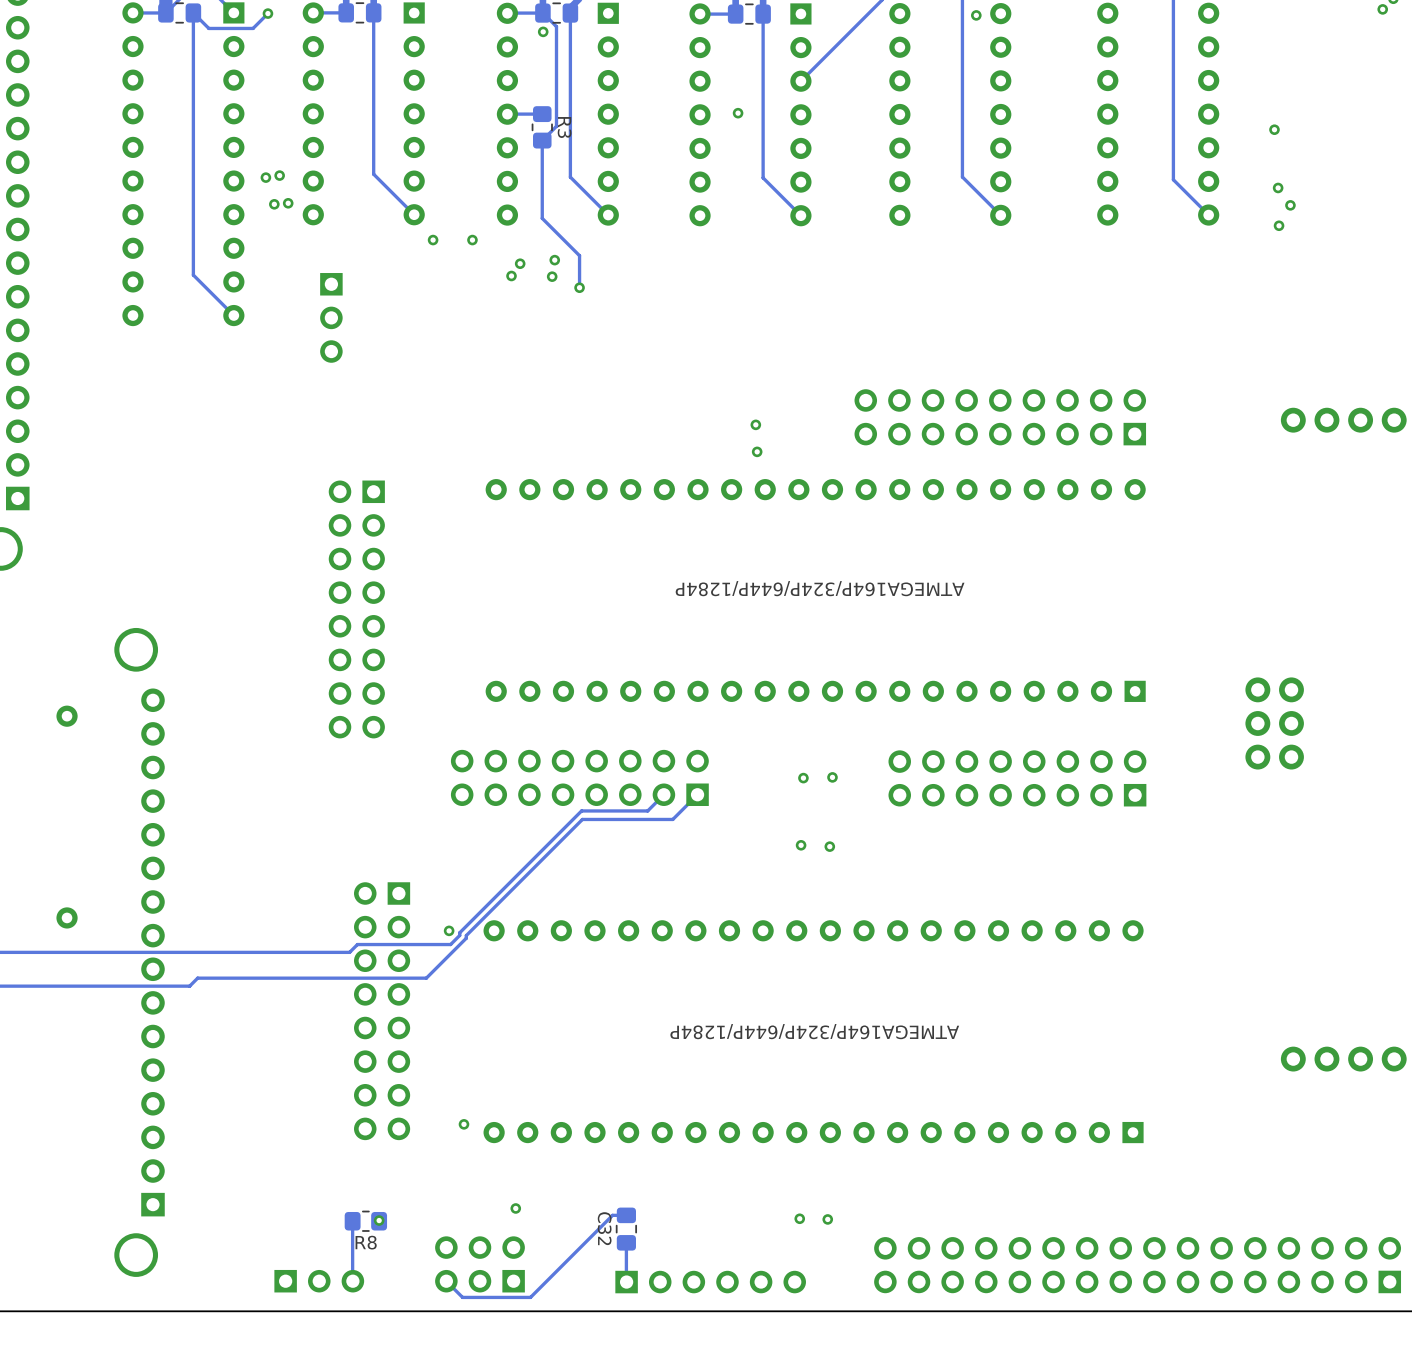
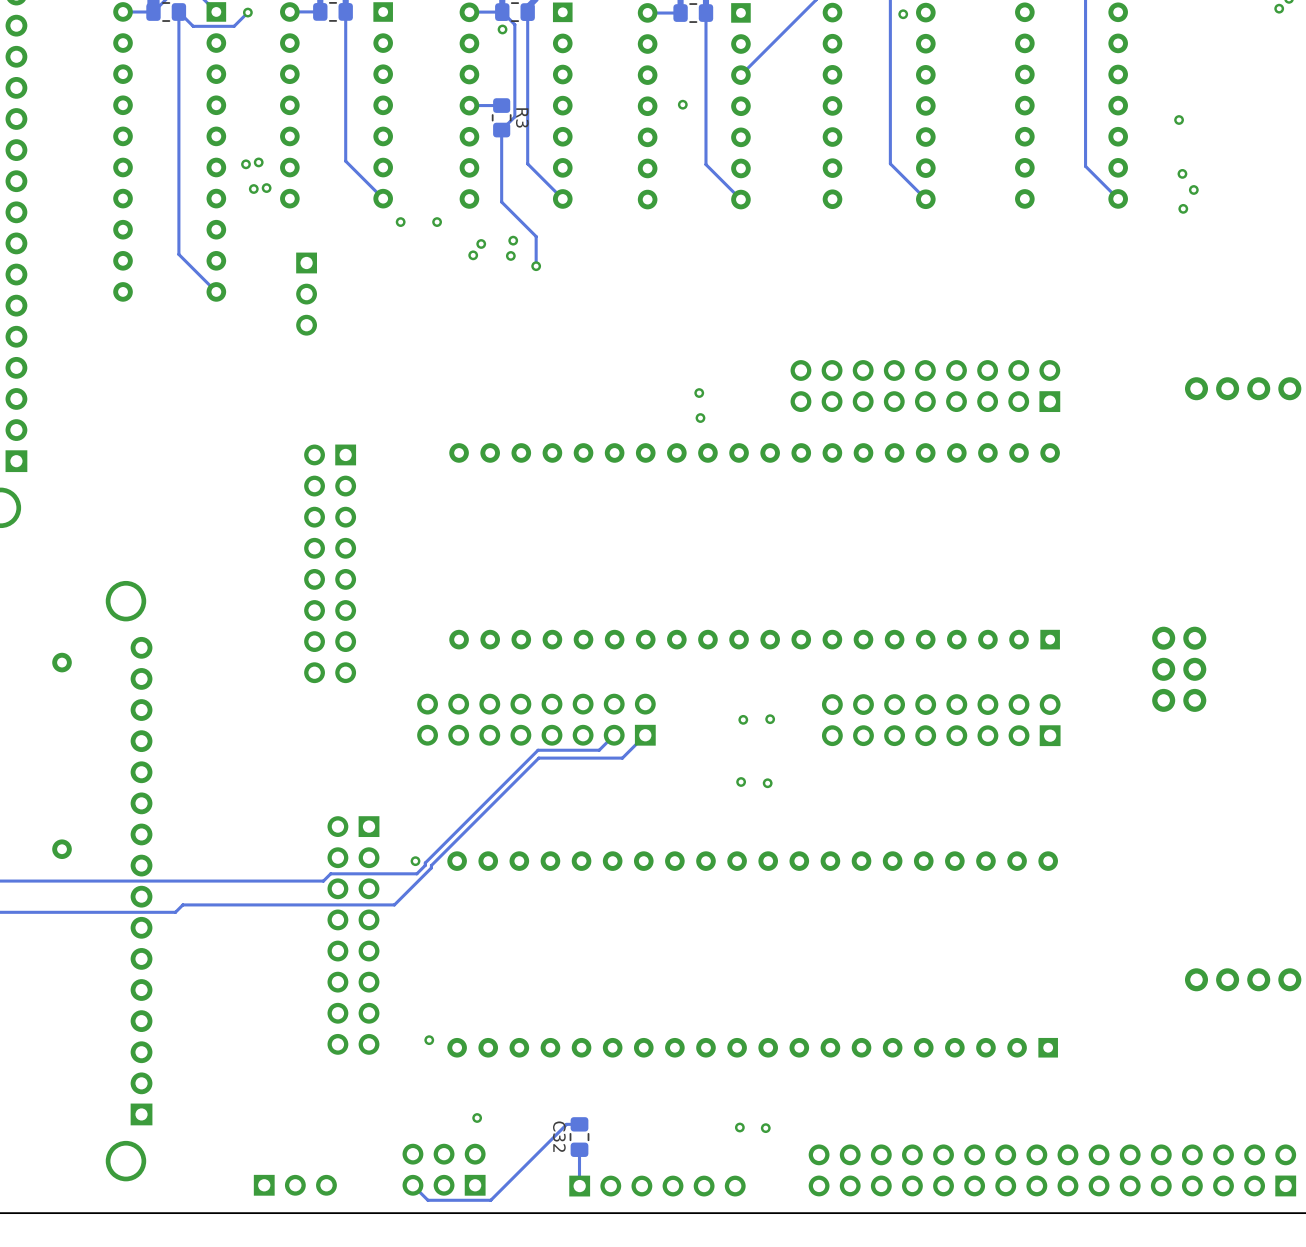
text: ATMEGA164P/324P/644P/1284P (820, 588) -> none
text: ATMEGA164P/324P/644P/1284P (814, 1031) -> none
via: (379, 1220) -> none
track: (352, 1221) (352, 1281) -> none
R8: (365, 1221) -> none

